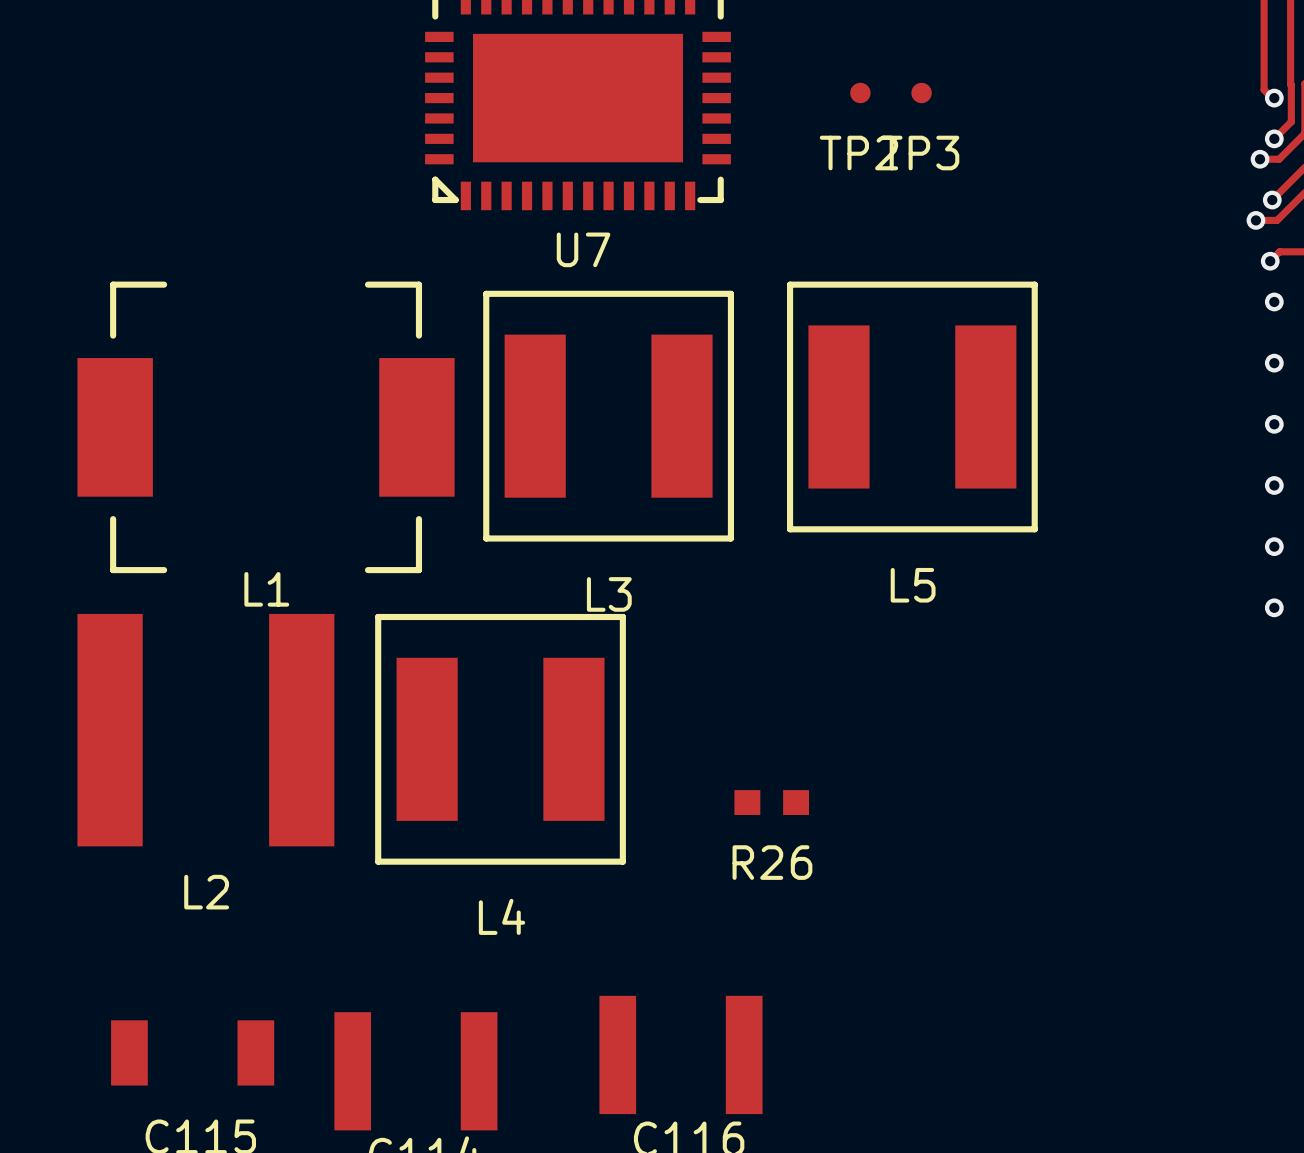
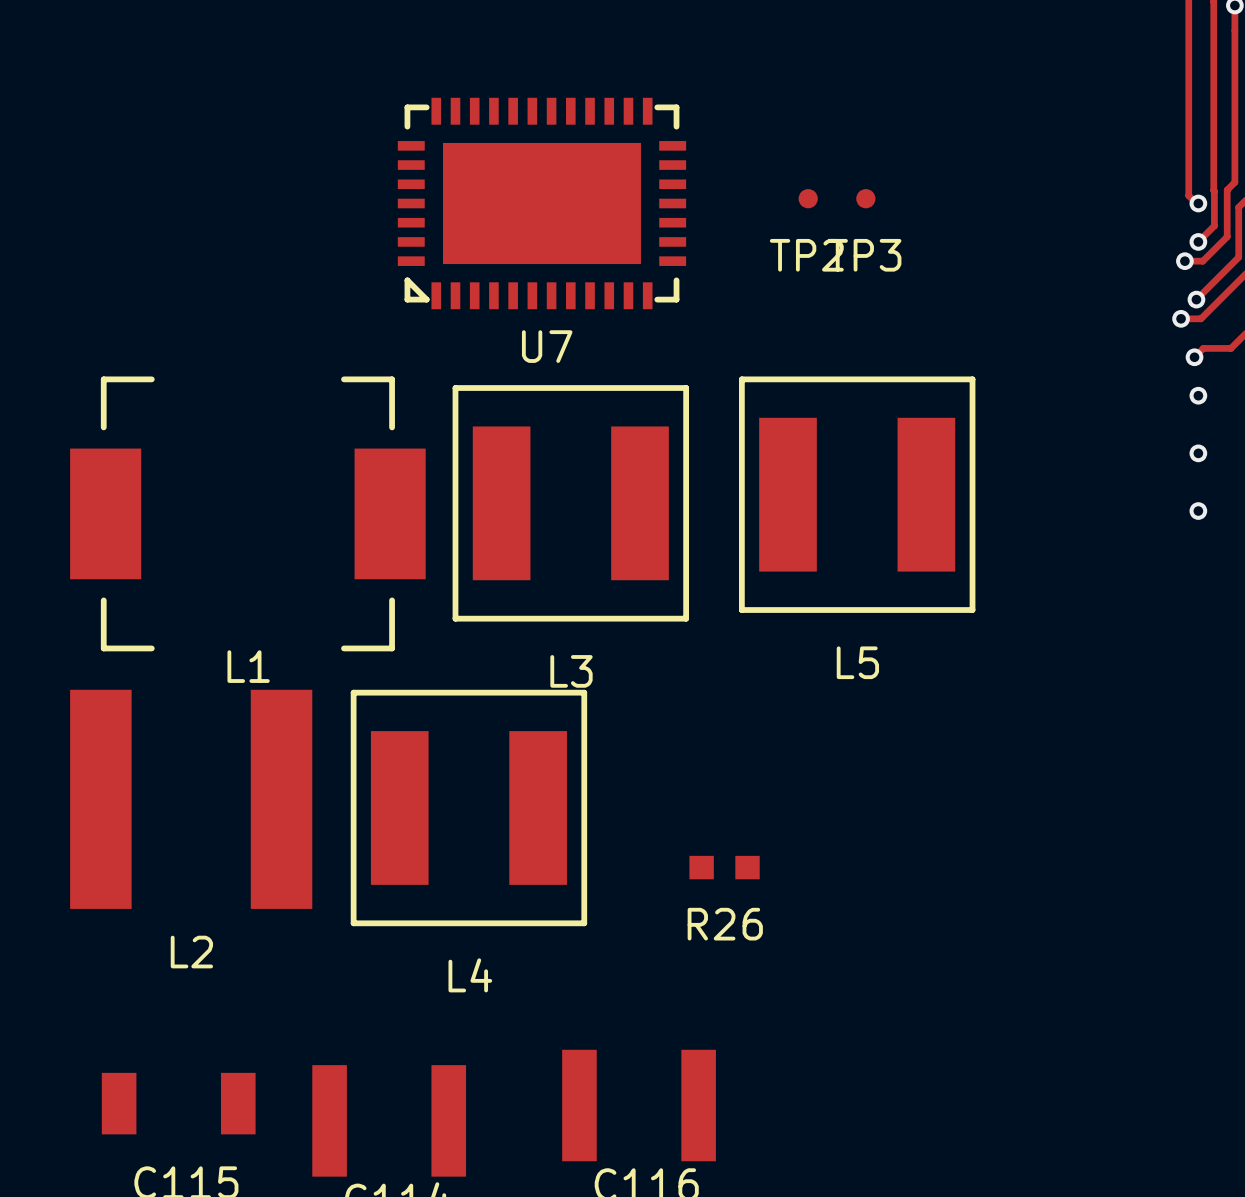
via: (1274, 485) -> none
via: (1274, 546) -> none
via: (1274, 607) -> none

